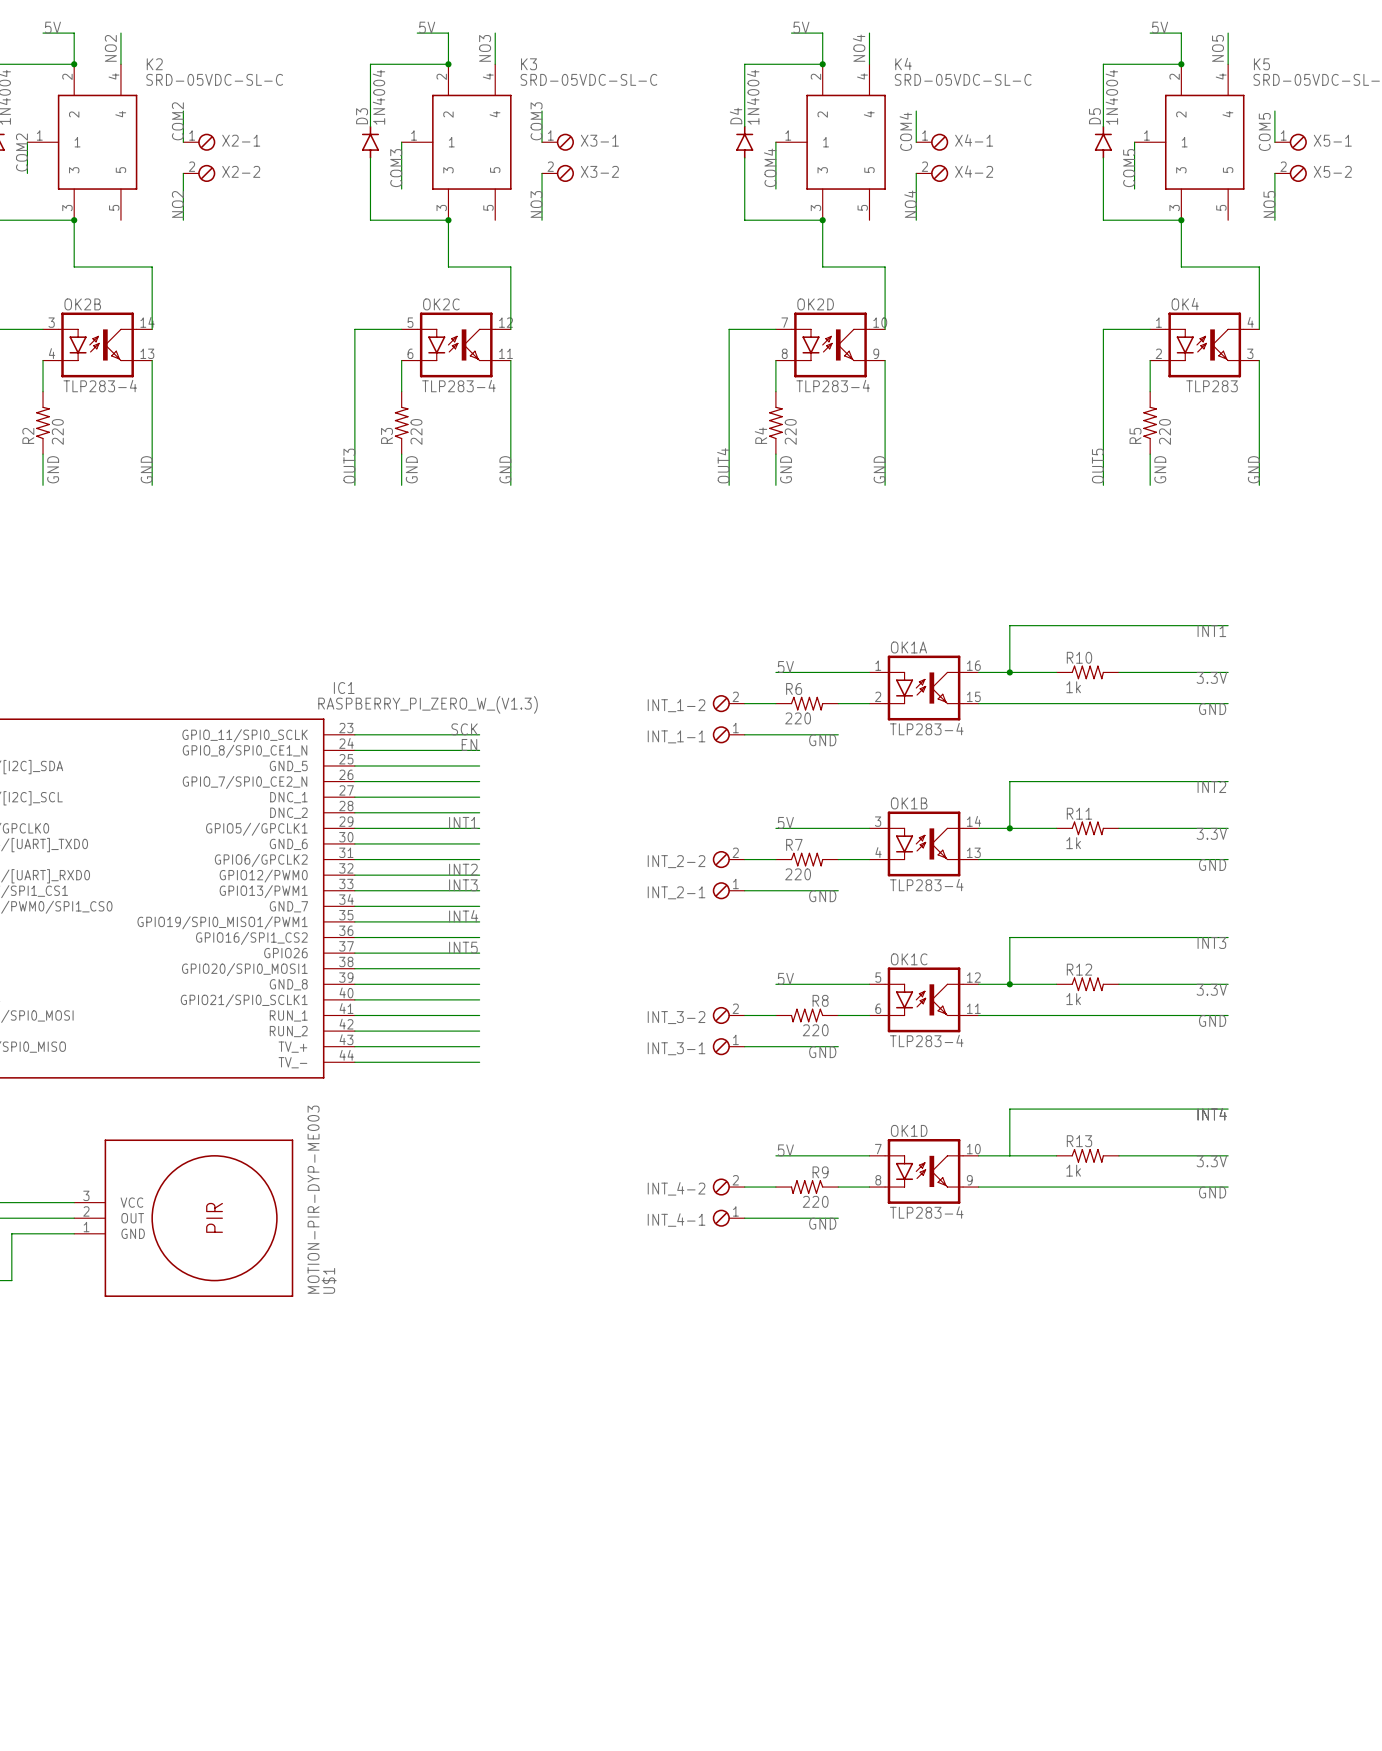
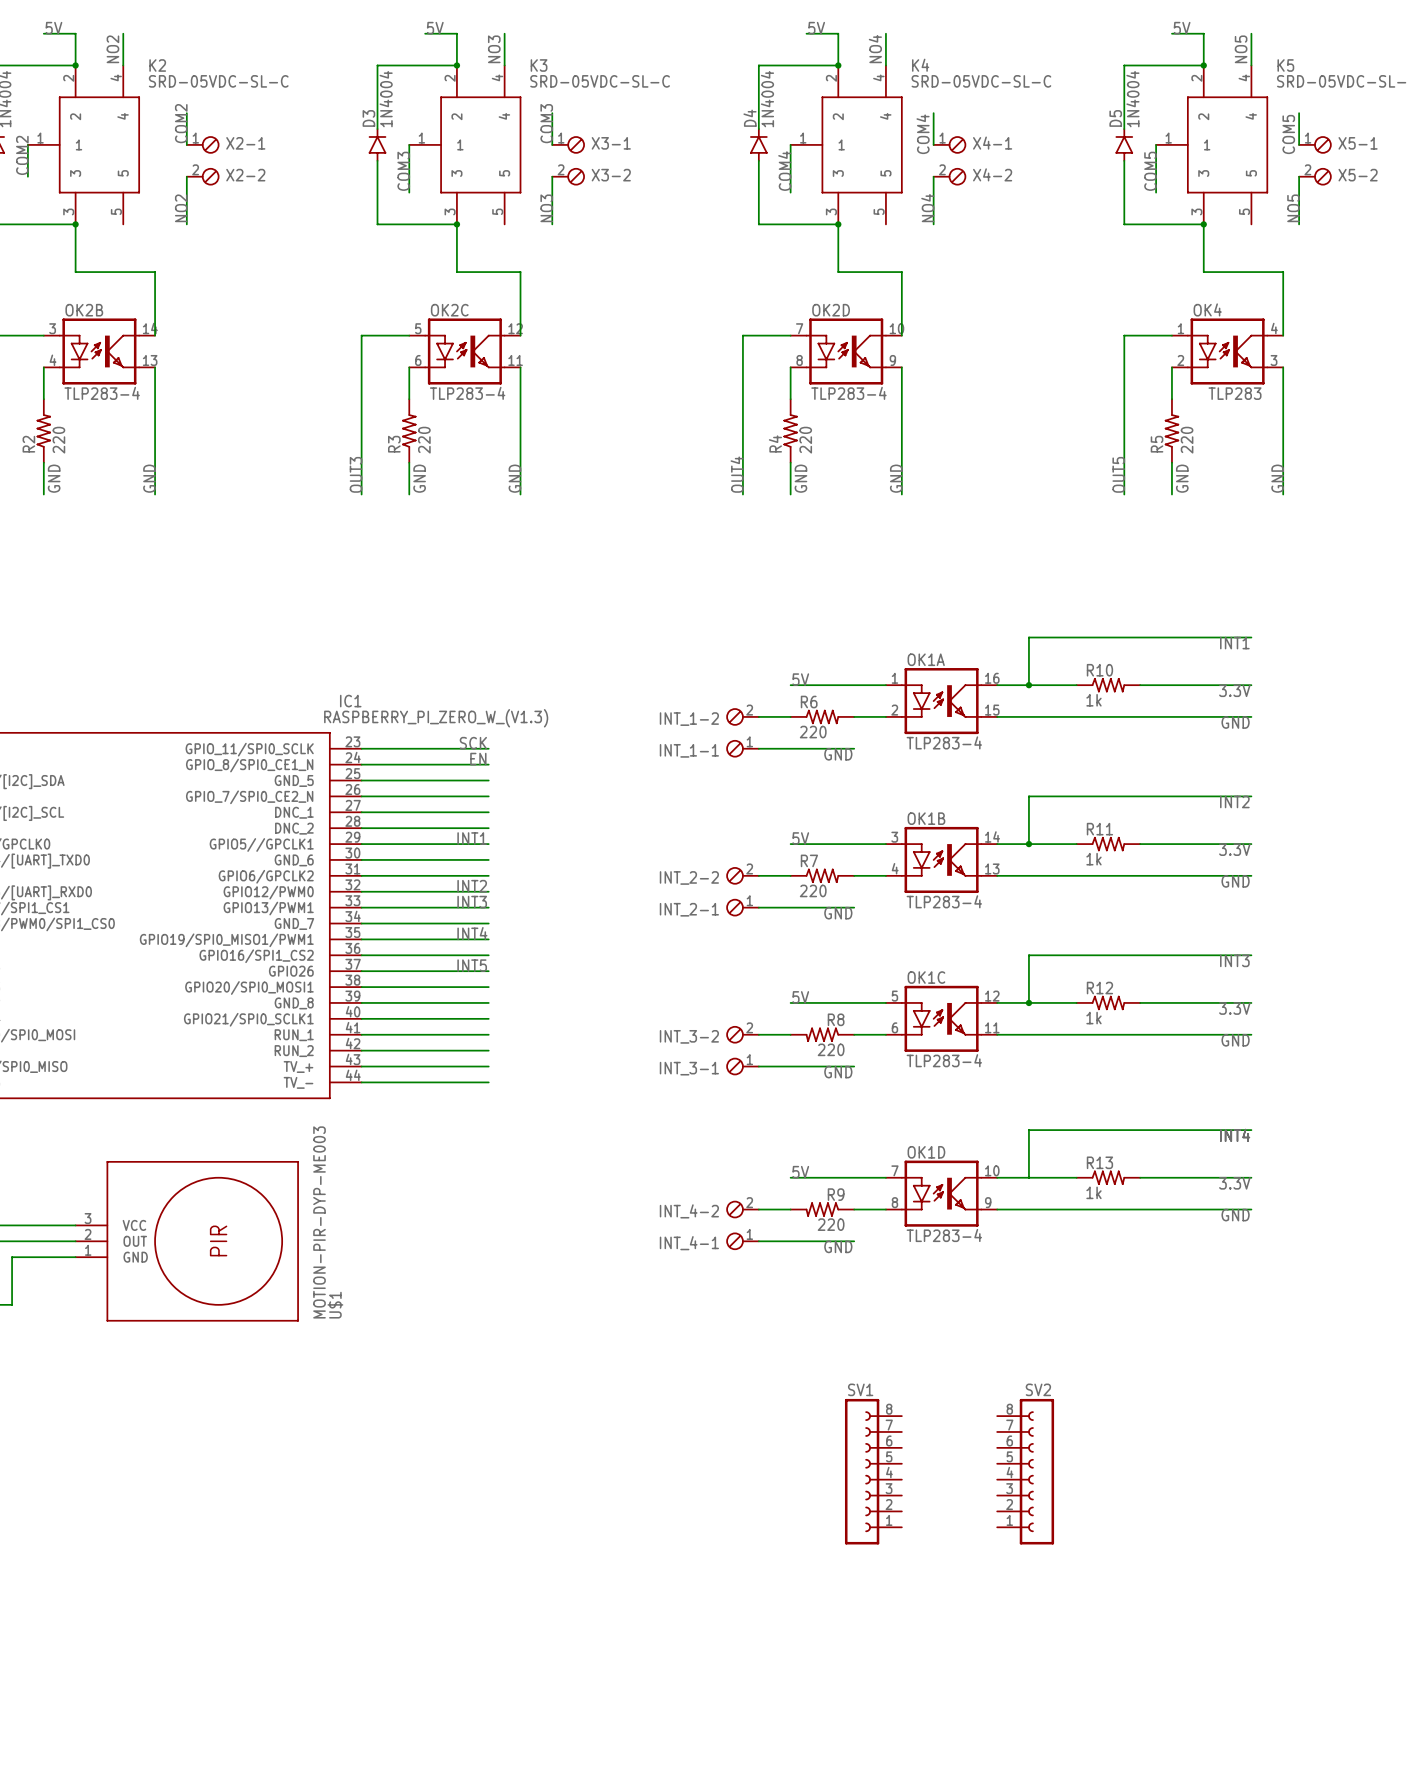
SV1: none -> (873, 1471)
SV2: none -> (1025, 1471)

